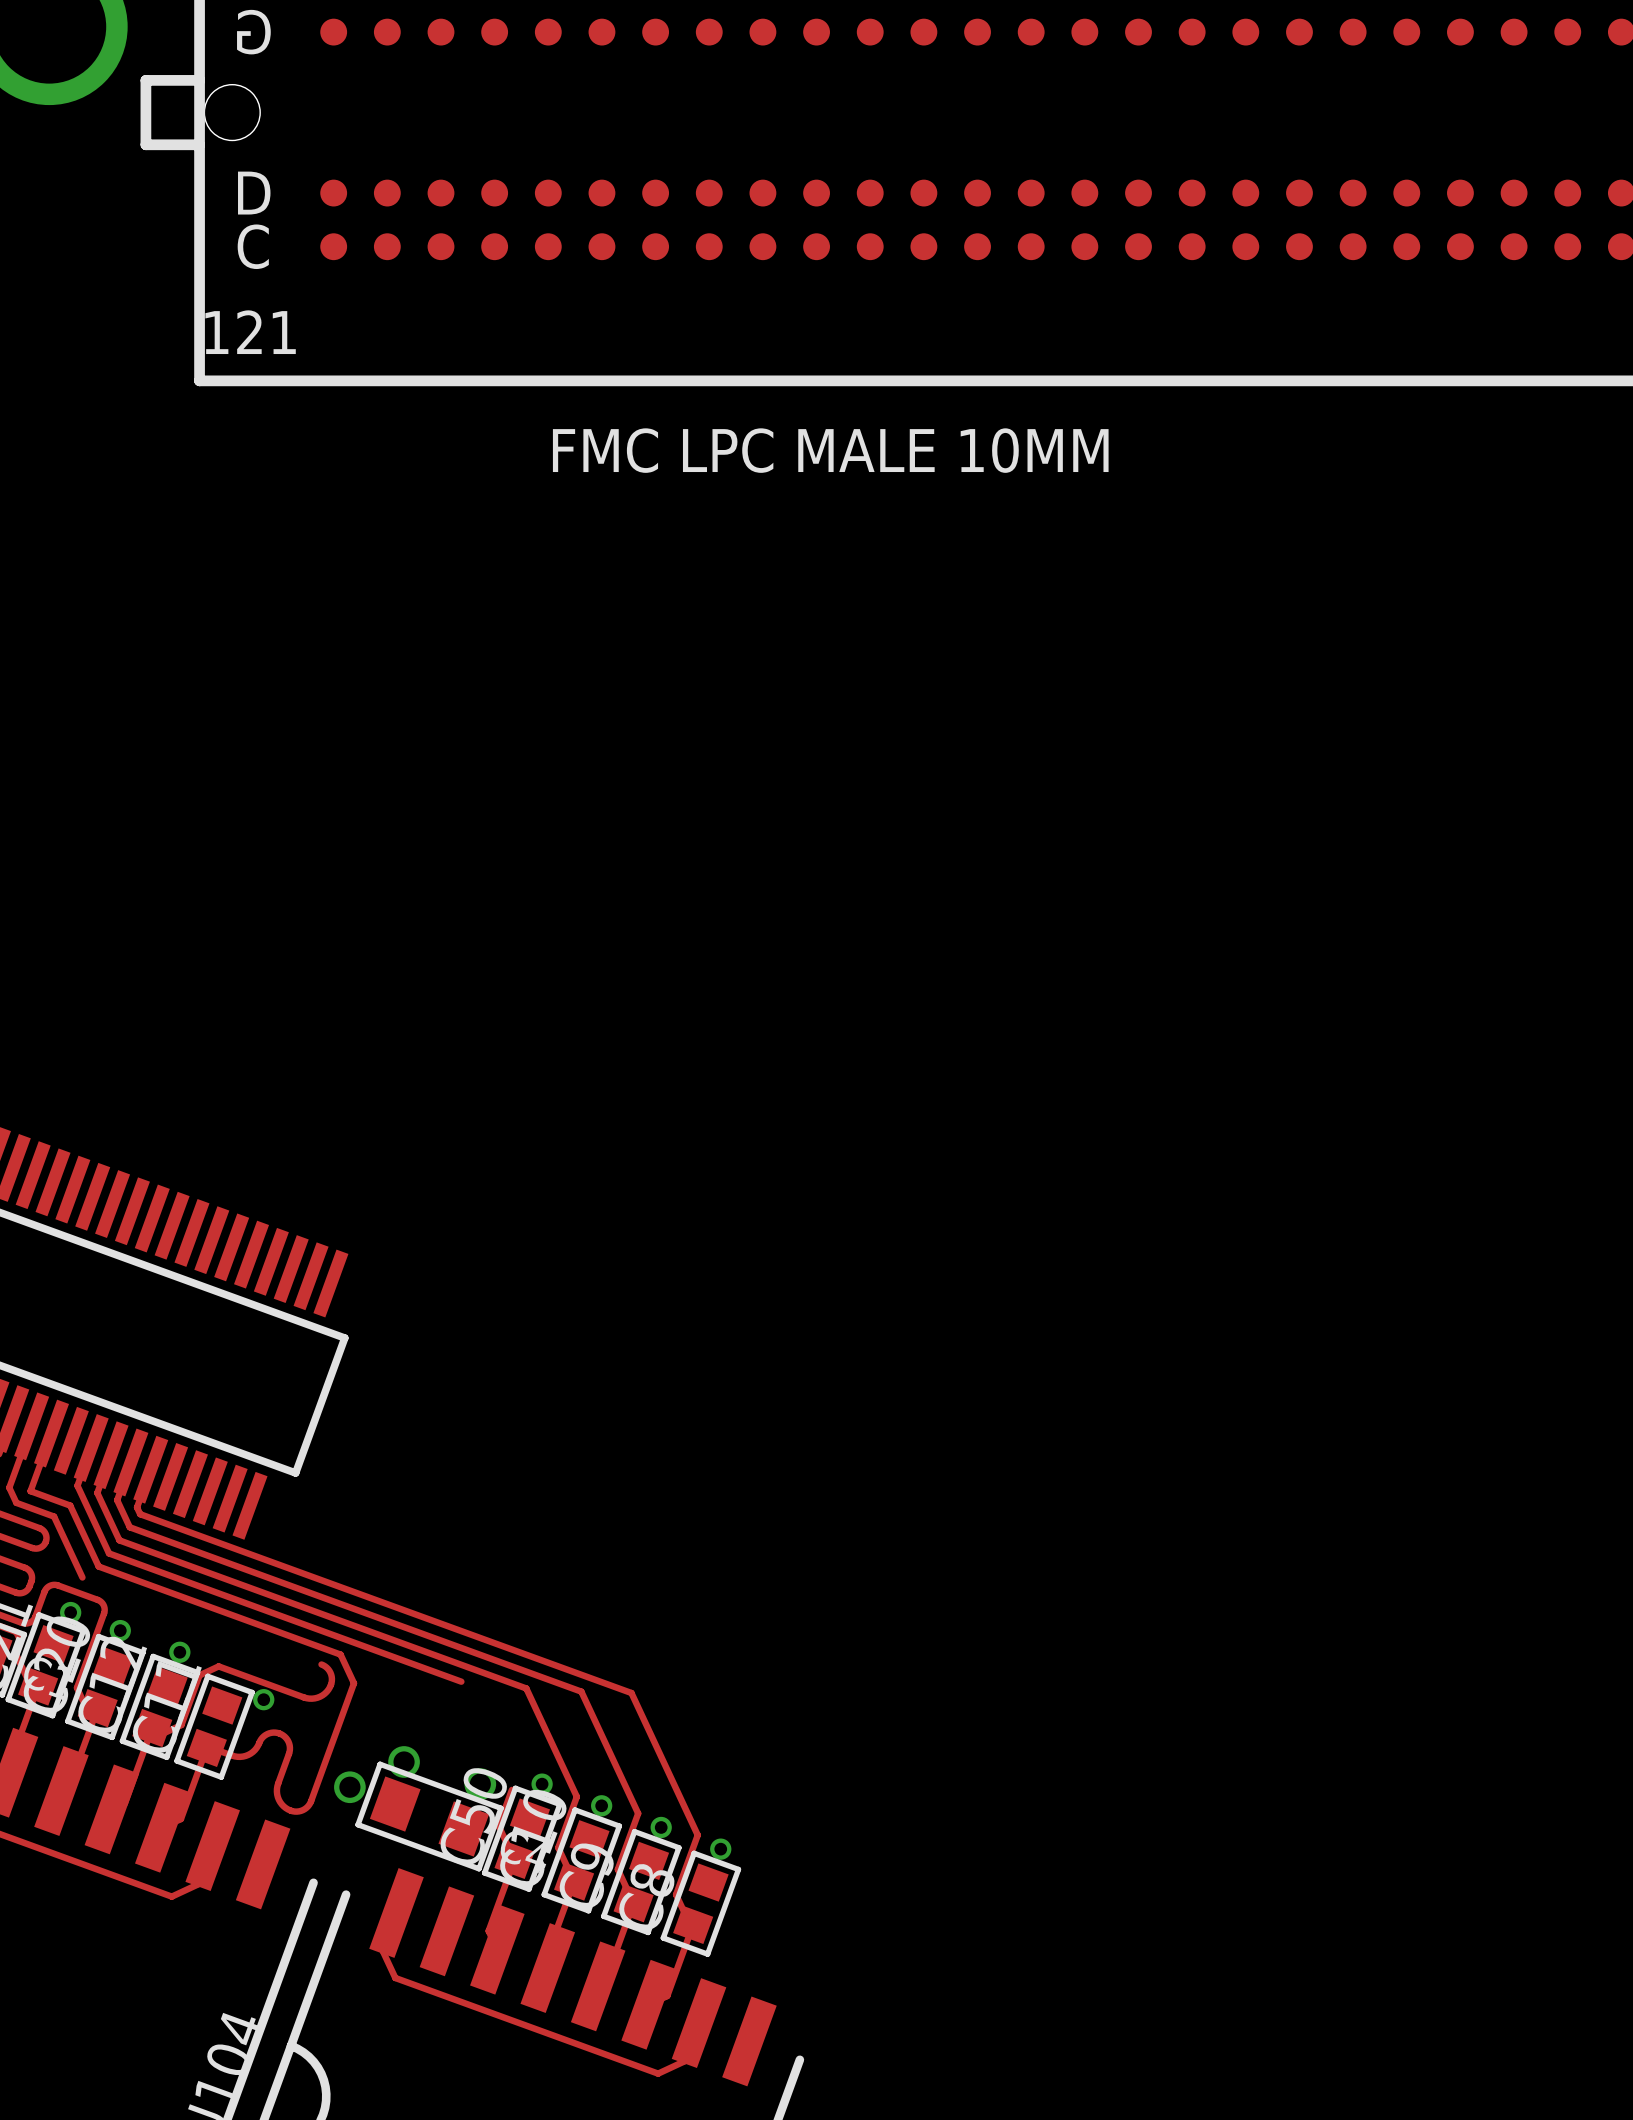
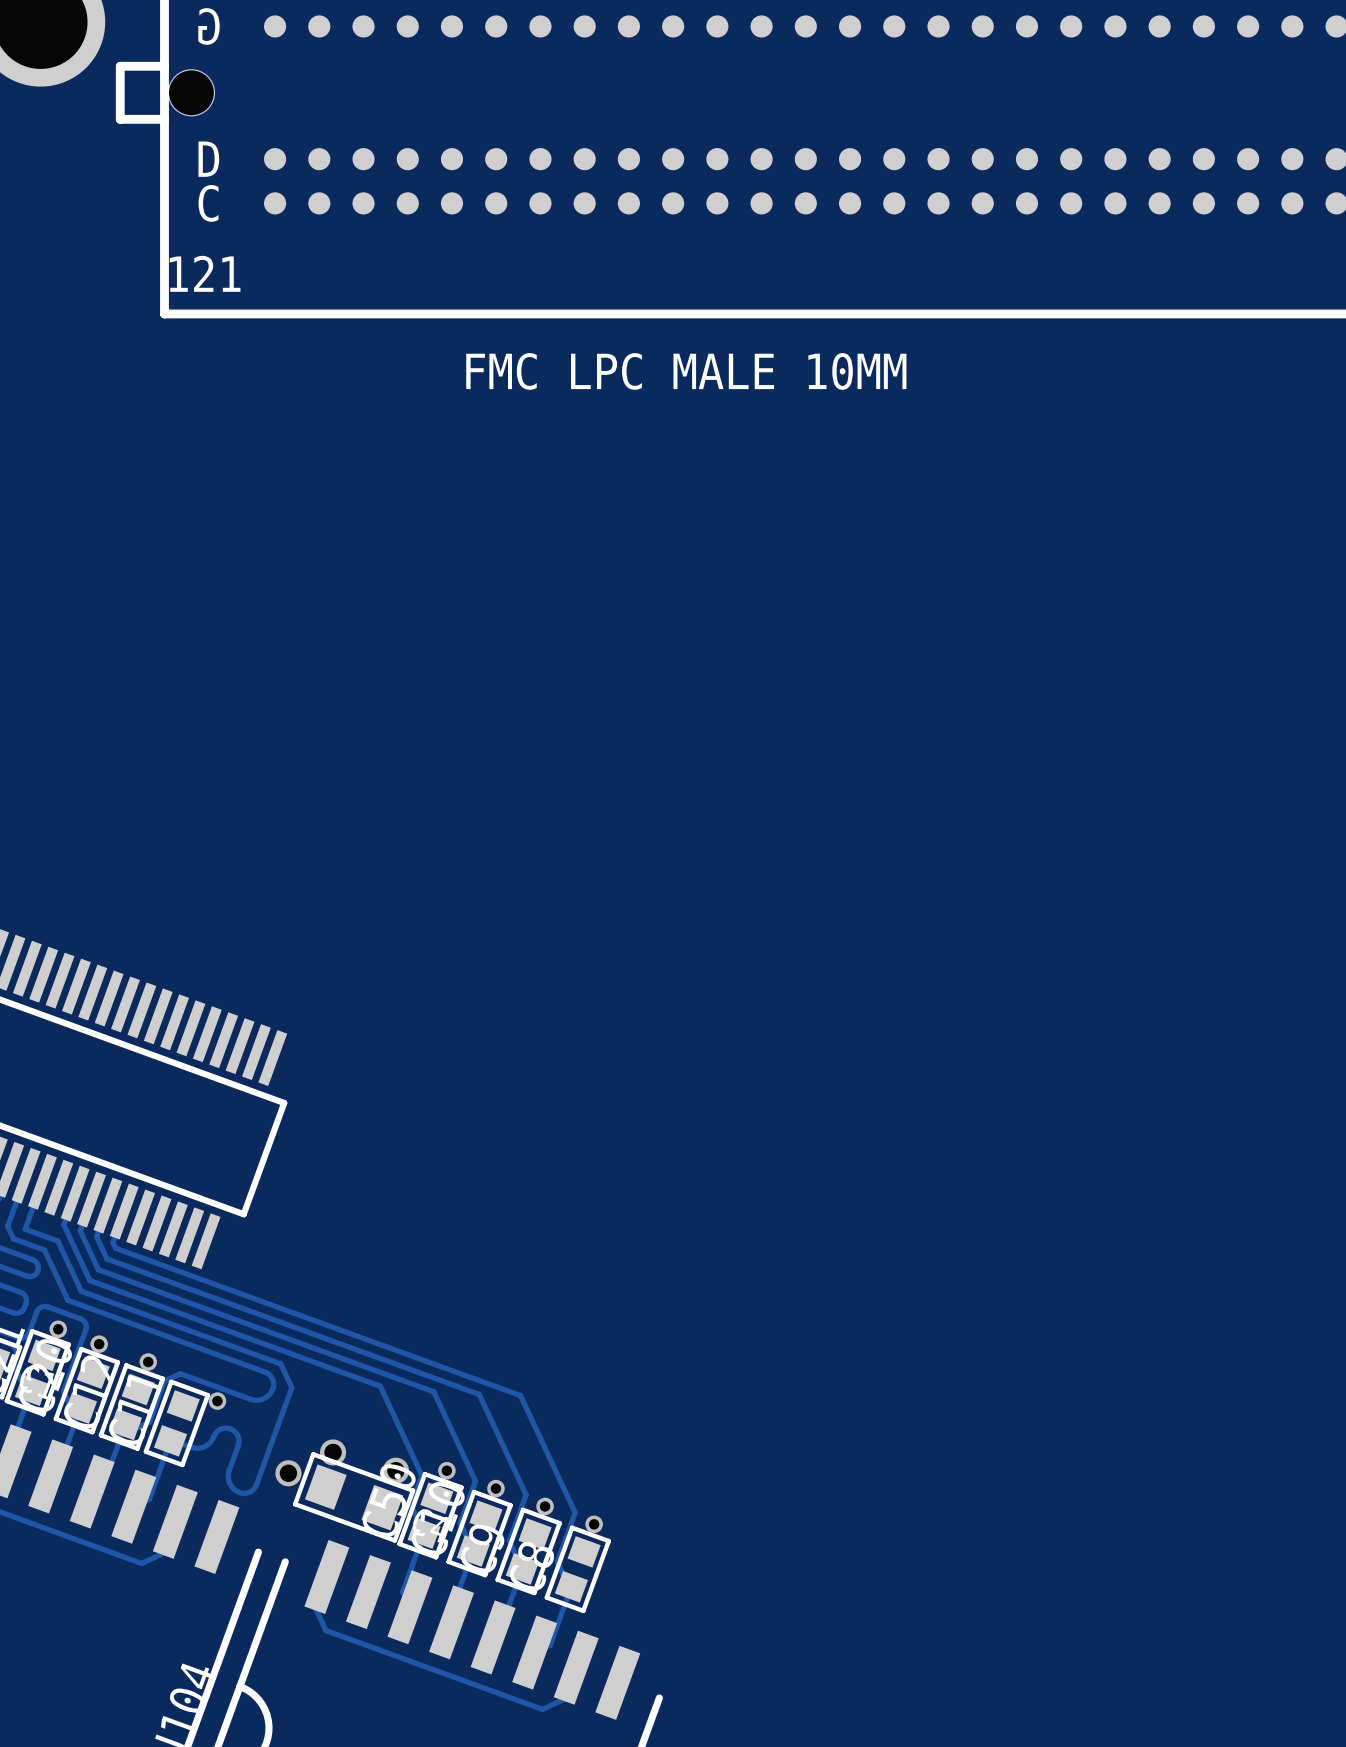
track: none -> (67, 1300) (265, 1372)
track: none -> (380, 1386) (421, 1475)

